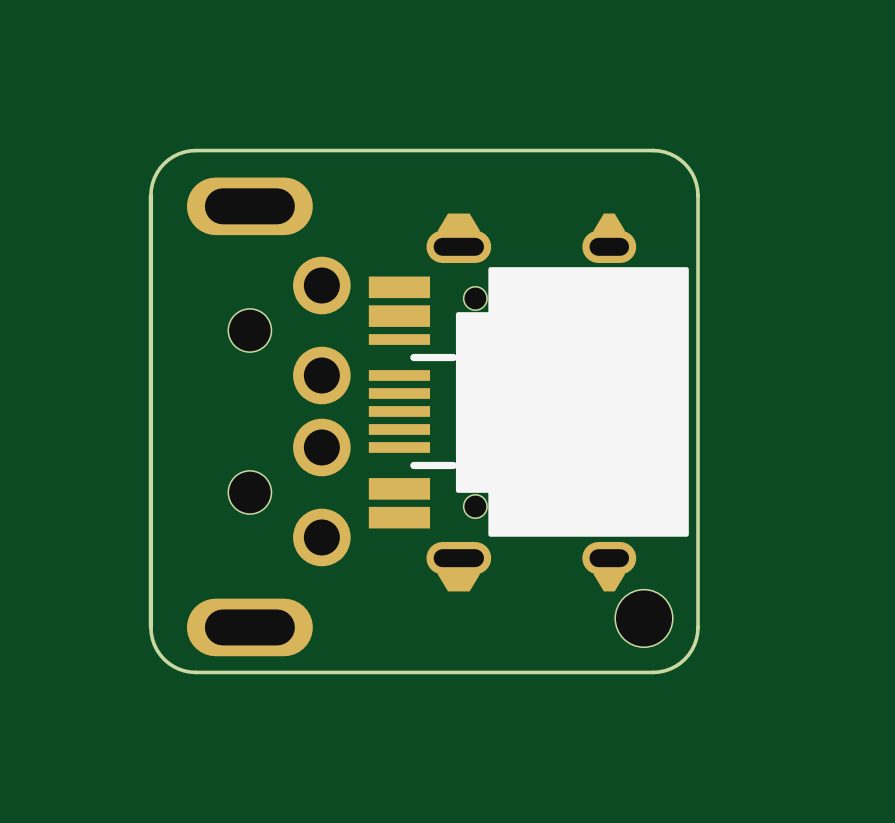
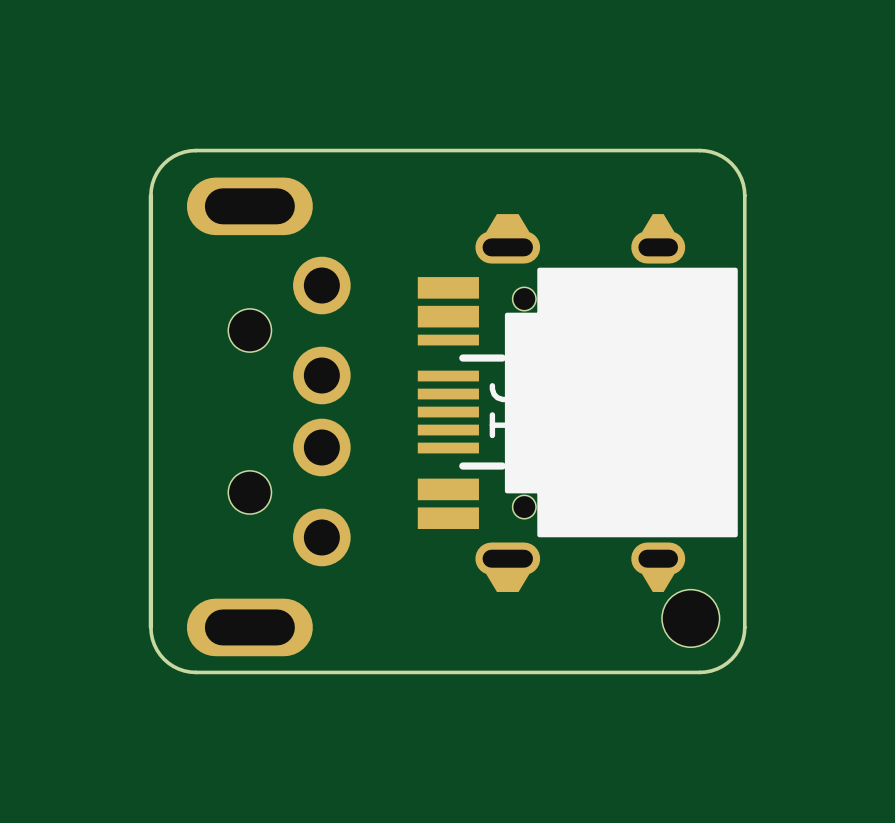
board edge: (653, 150) (670, 153) (684, 163) (694, 178) (697, 195) (697, 633) (691, 649) (680, 663) (664, 670) (653, 672) -> (653, 150) (699, 150) (717, 153) (731, 163) (738, 173) (743, 183) (744, 195) (744, 633) (741, 644) (735, 654) (727, 663) (717, 669) (699, 672) (653, 672)
part position: (528, 402) -> (577, 403)
part position: (644, 618) -> (690, 618)

